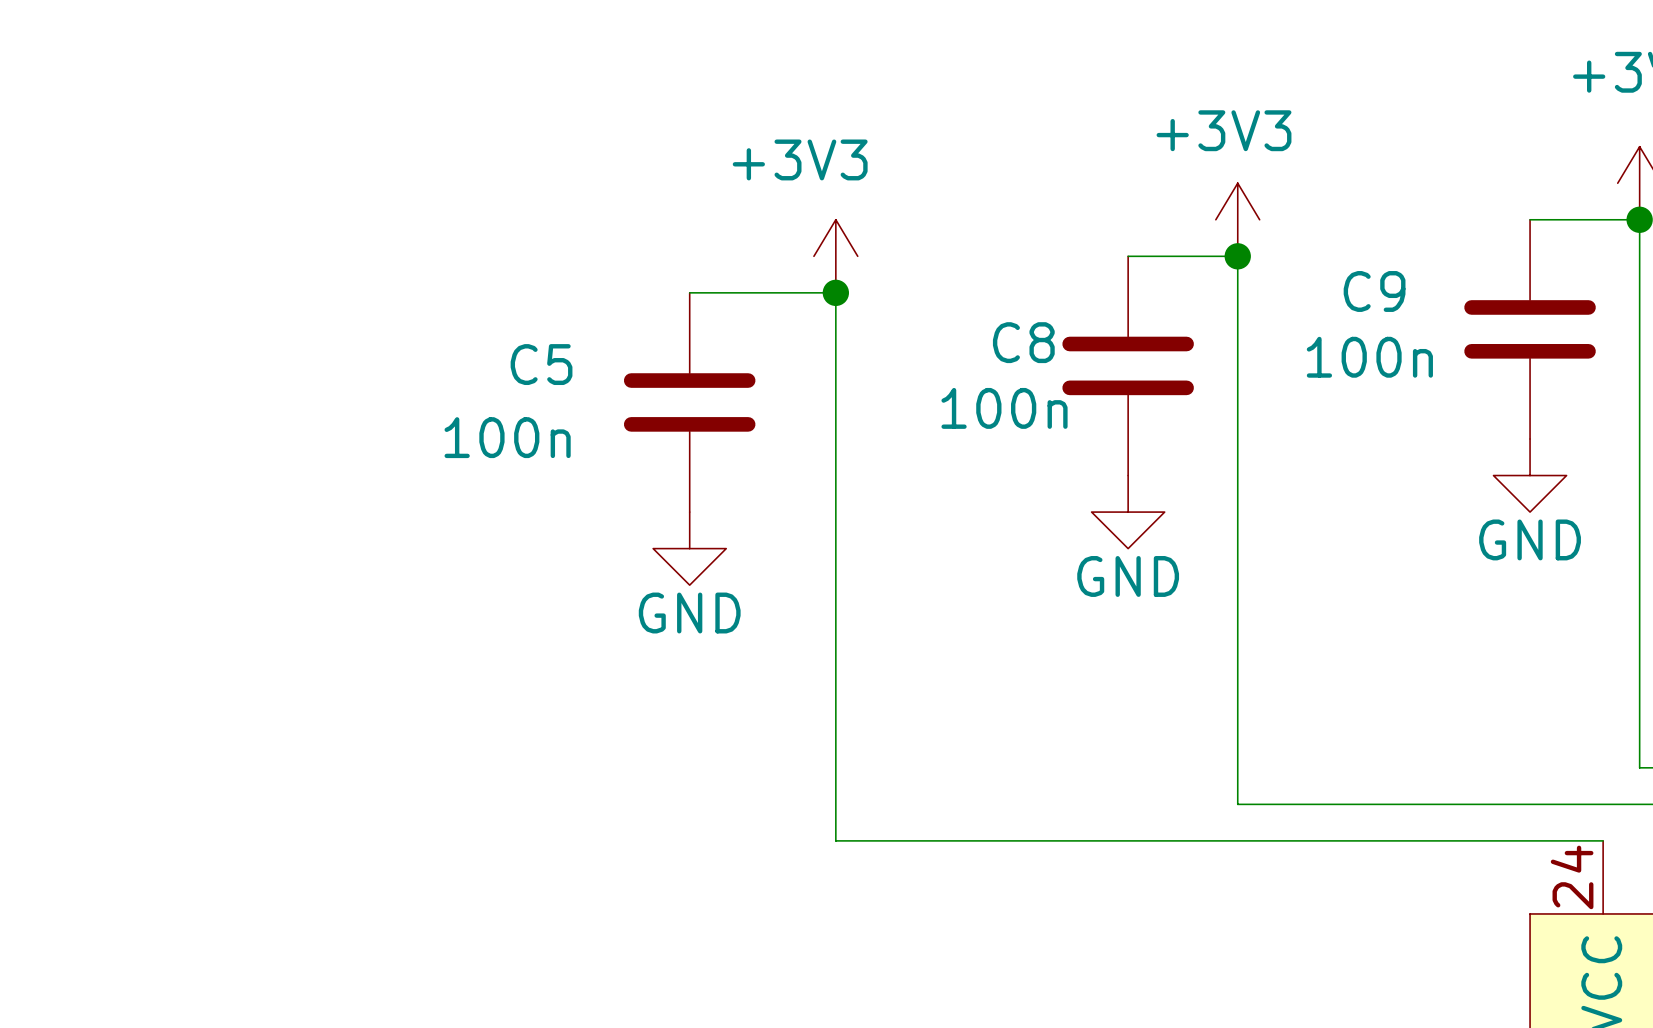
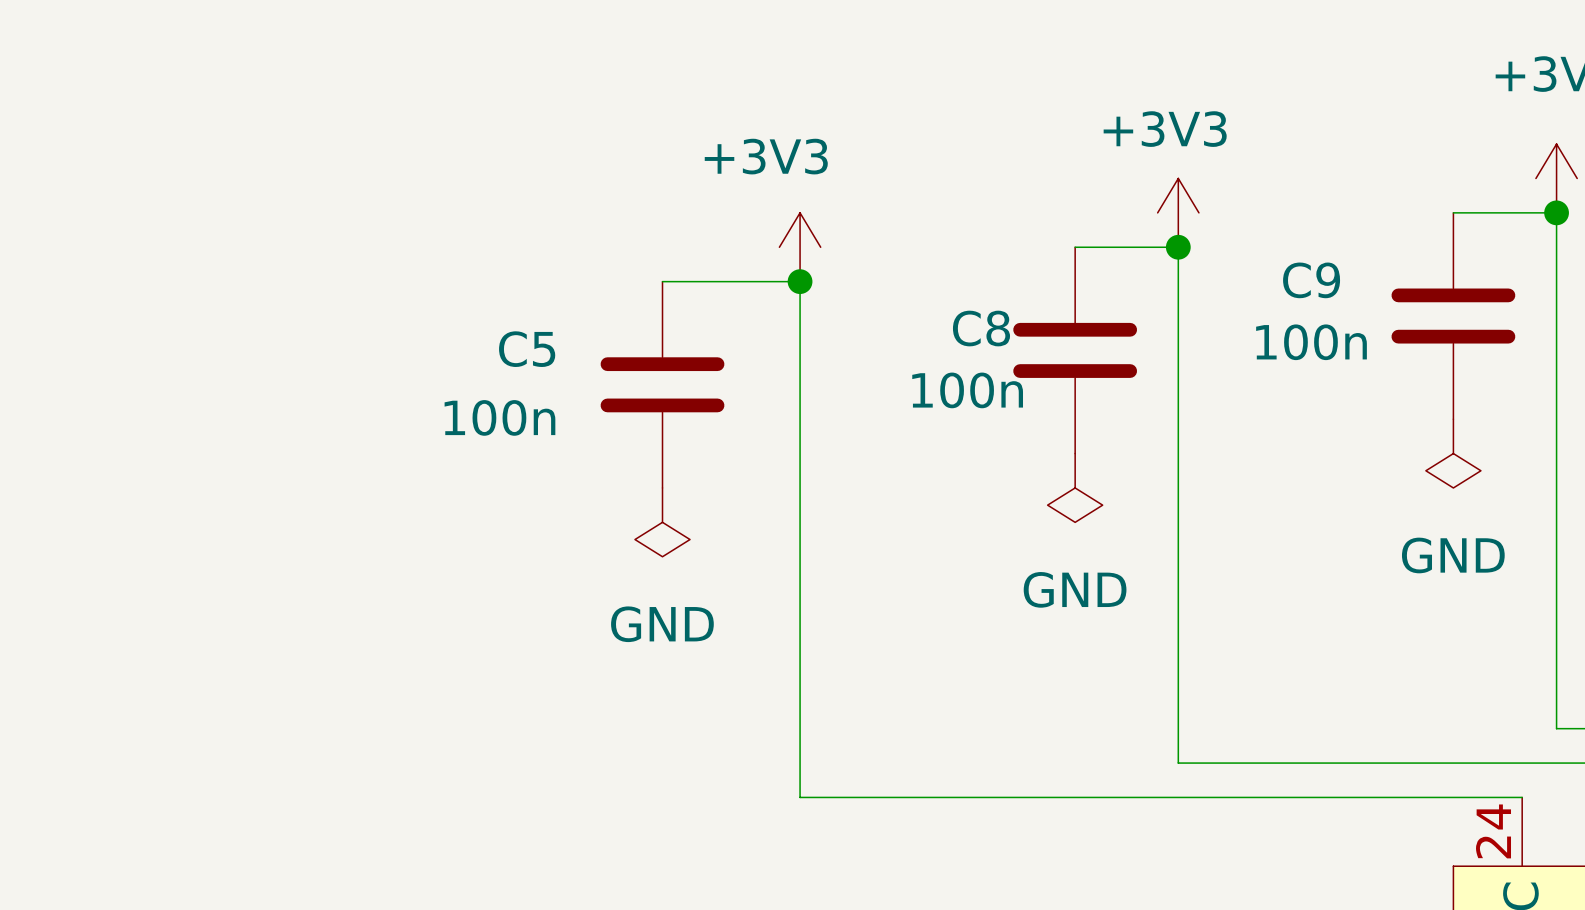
power symbol shape: [1493, 439, 1567, 513] -> [1425, 419, 1481, 488]
power symbol shape: [1091, 475, 1165, 549] -> [1047, 453, 1103, 523]
power symbol shape: [653, 512, 727, 586] -> [634, 487, 691, 557]
power symbol text position: GND (1530, 539) -> GND (1453, 555)
power symbol text position: GND (1128, 576) -> GND (1075, 589)
power symbol text position: GND (689, 613) -> GND (662, 624)

